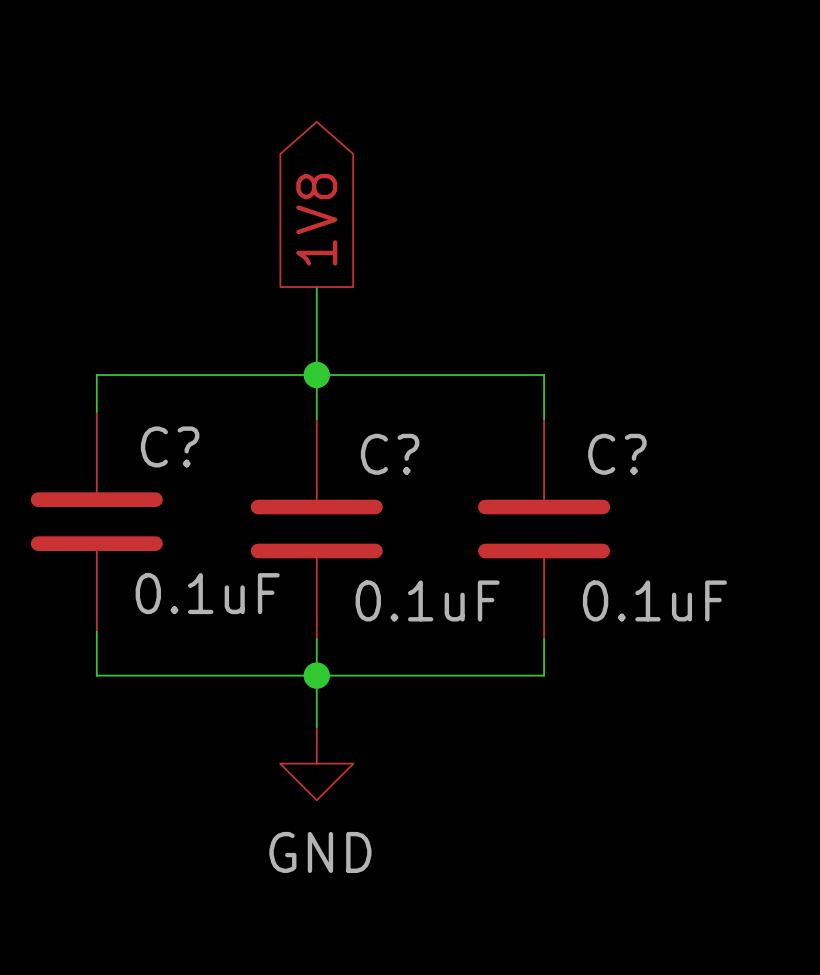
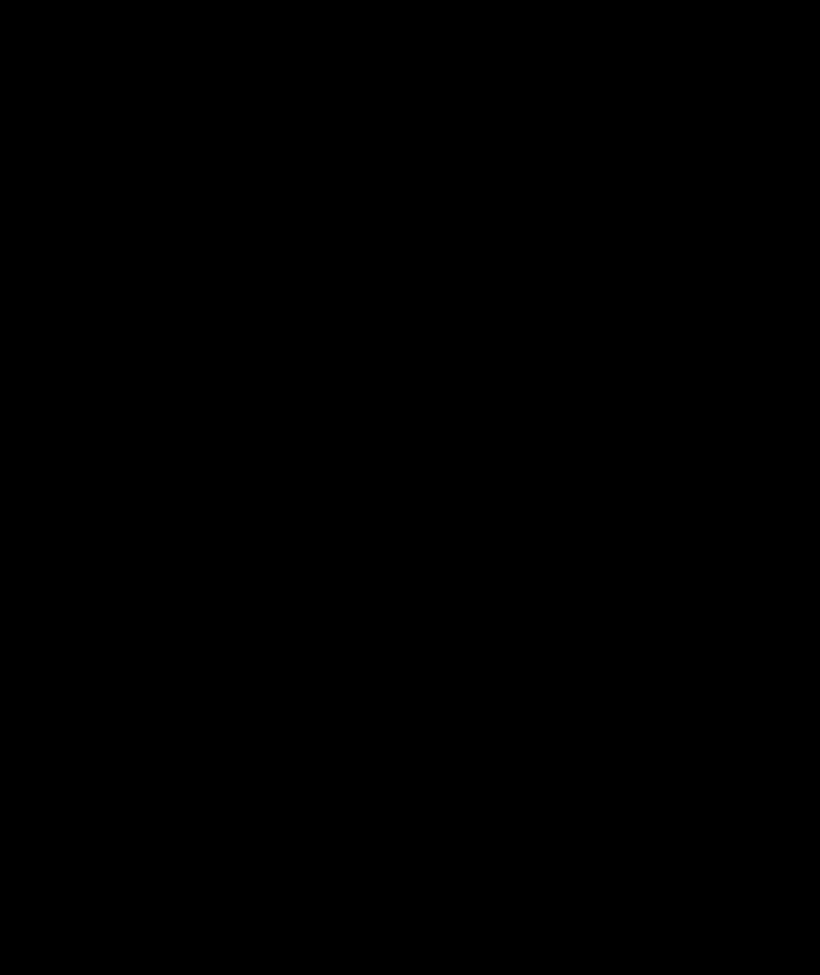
global label: 1V8 (316, 219) -> none
wire: (316, 287) (316, 419) -> none
junction: (316, 375) -> none
wire: (96, 411) (96, 375) (544, 375) (544, 419) -> none
C?: 0.1uF (96, 521) -> none
C?: 0.1uF (316, 528) -> none
C?: 0.1uF (544, 528) -> none
wire: (96, 631) (96, 675) (544, 675) (544, 638) -> none
wire: (316, 638) (316, 726) -> none
junction: (316, 675) -> none
power symbol: GND (316, 763) -> none

